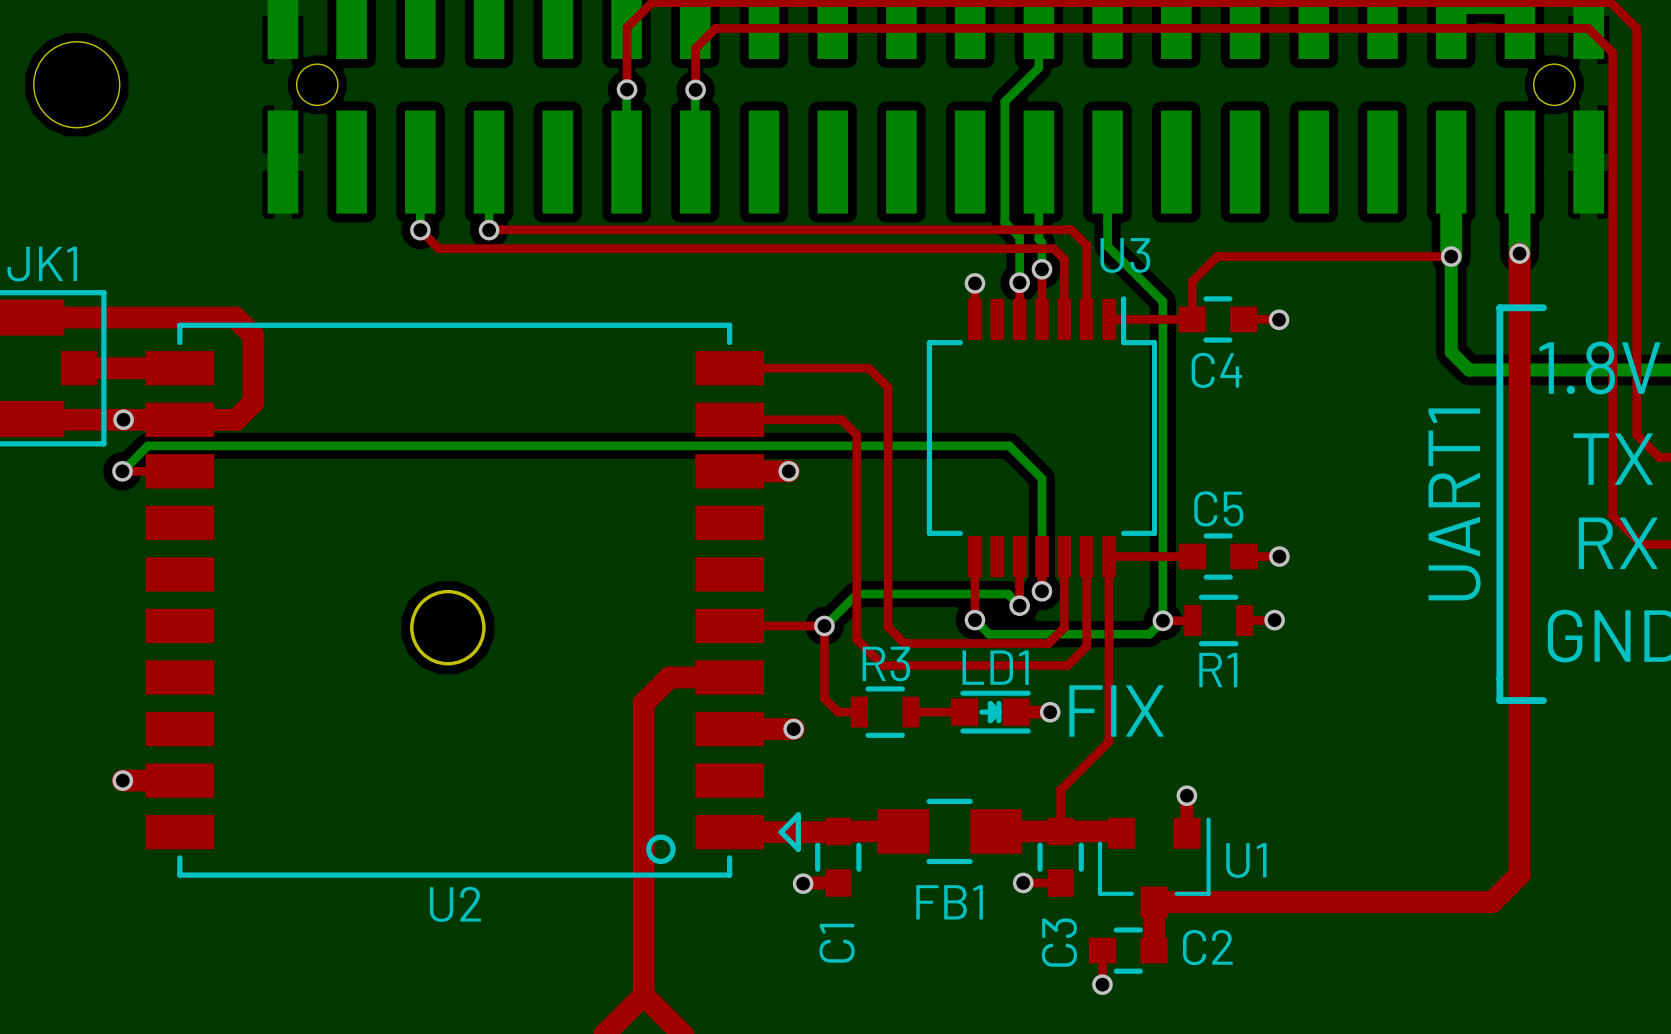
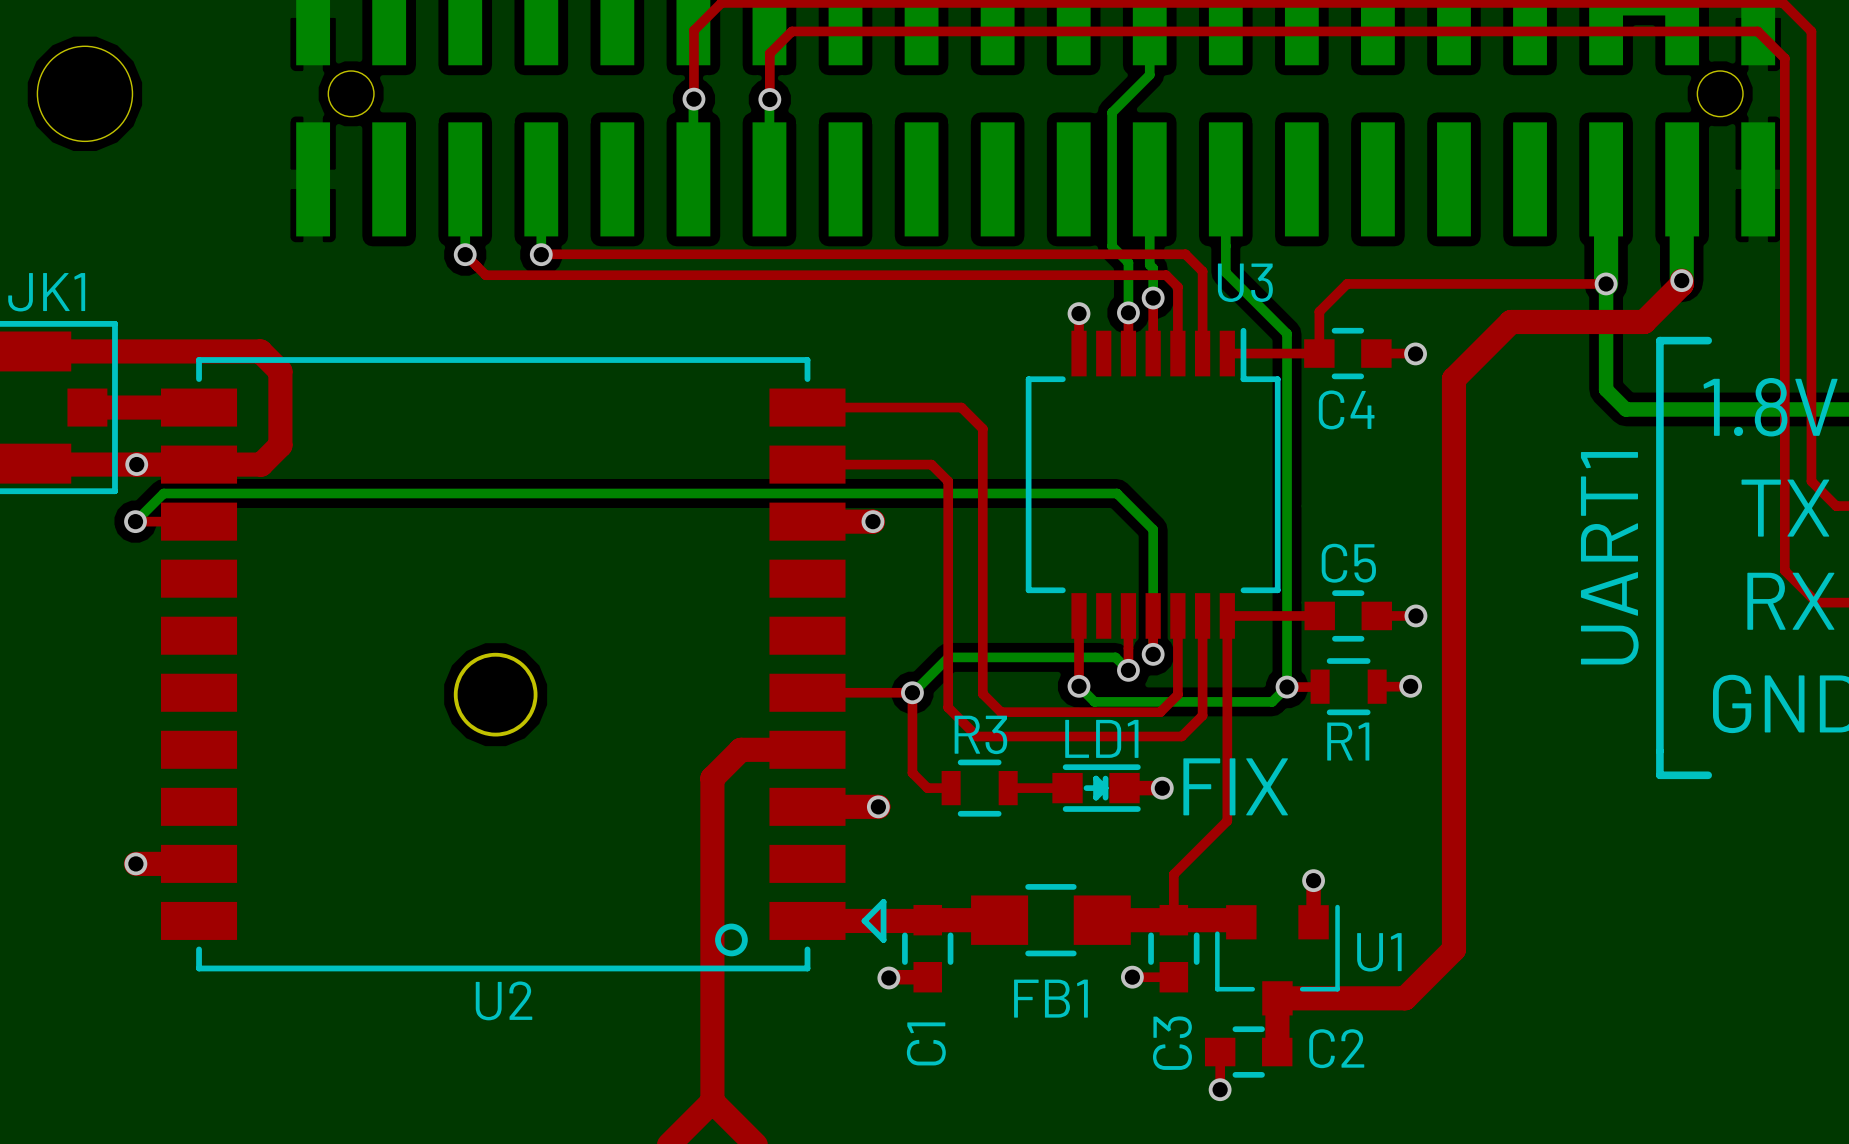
top track: (1519, 256) (1519, 874) (1492, 902) (1269, 902) -> (1681, 284) (1644, 321) (1511, 321) (1453, 379) (1453, 949) (1405, 998)

